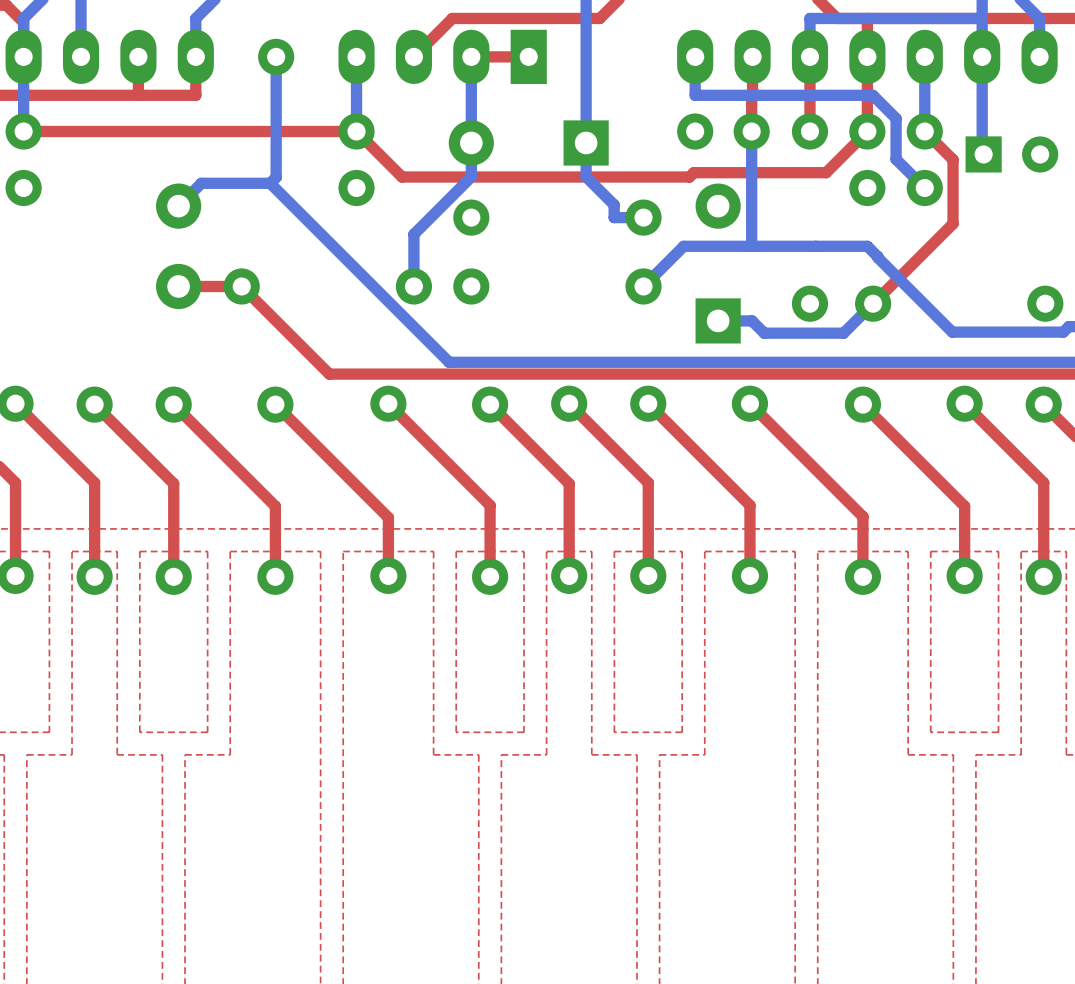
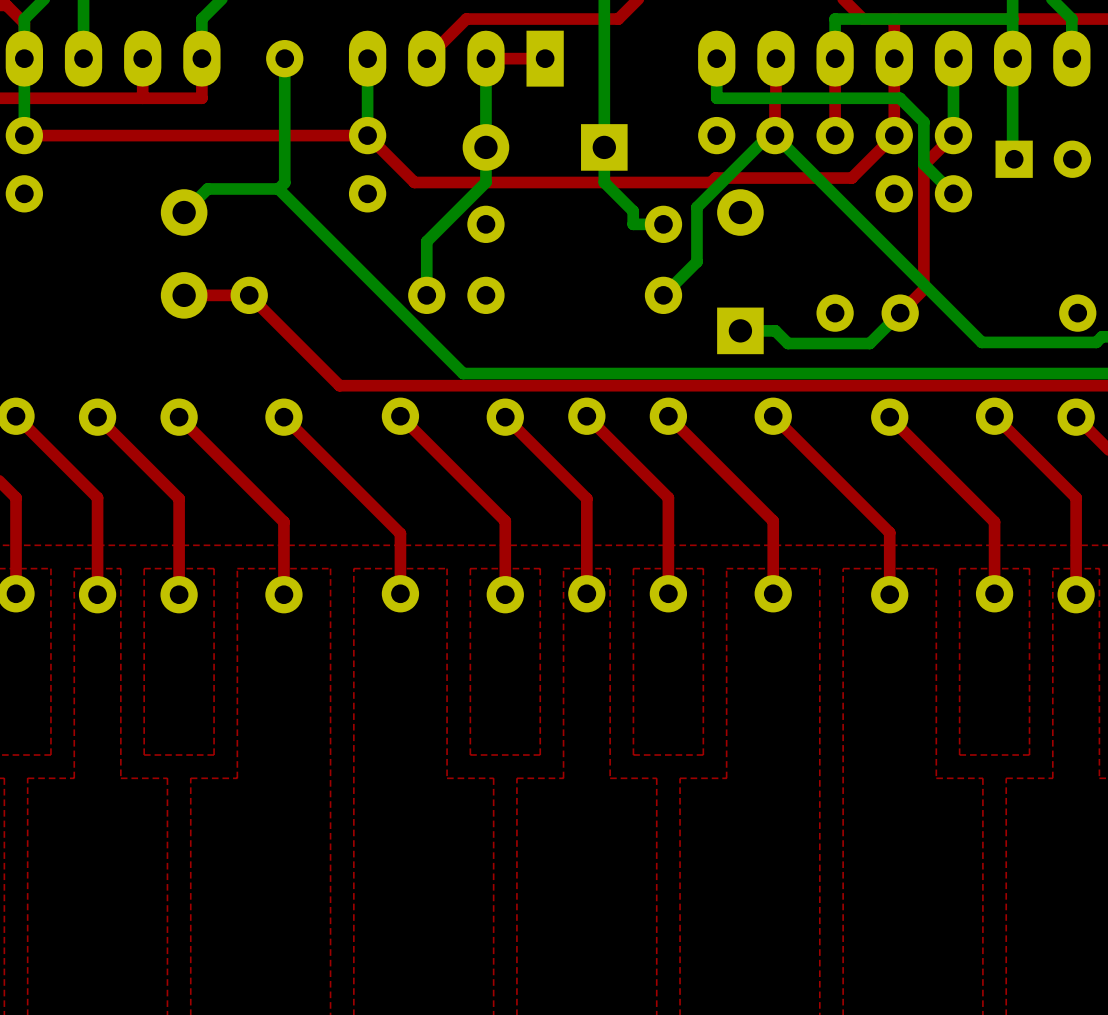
bottom track: (751, 131) (752, 246) -> (775, 135) (905, 265)
top track: (924, 131) (953, 159) (953, 223) (896, 280) -> (953, 135) (923, 165) (923, 289)
bottom track: (675, 254) (683, 246) (867, 246) (877, 257) -> (696, 261) (696, 207) (768, 135)

